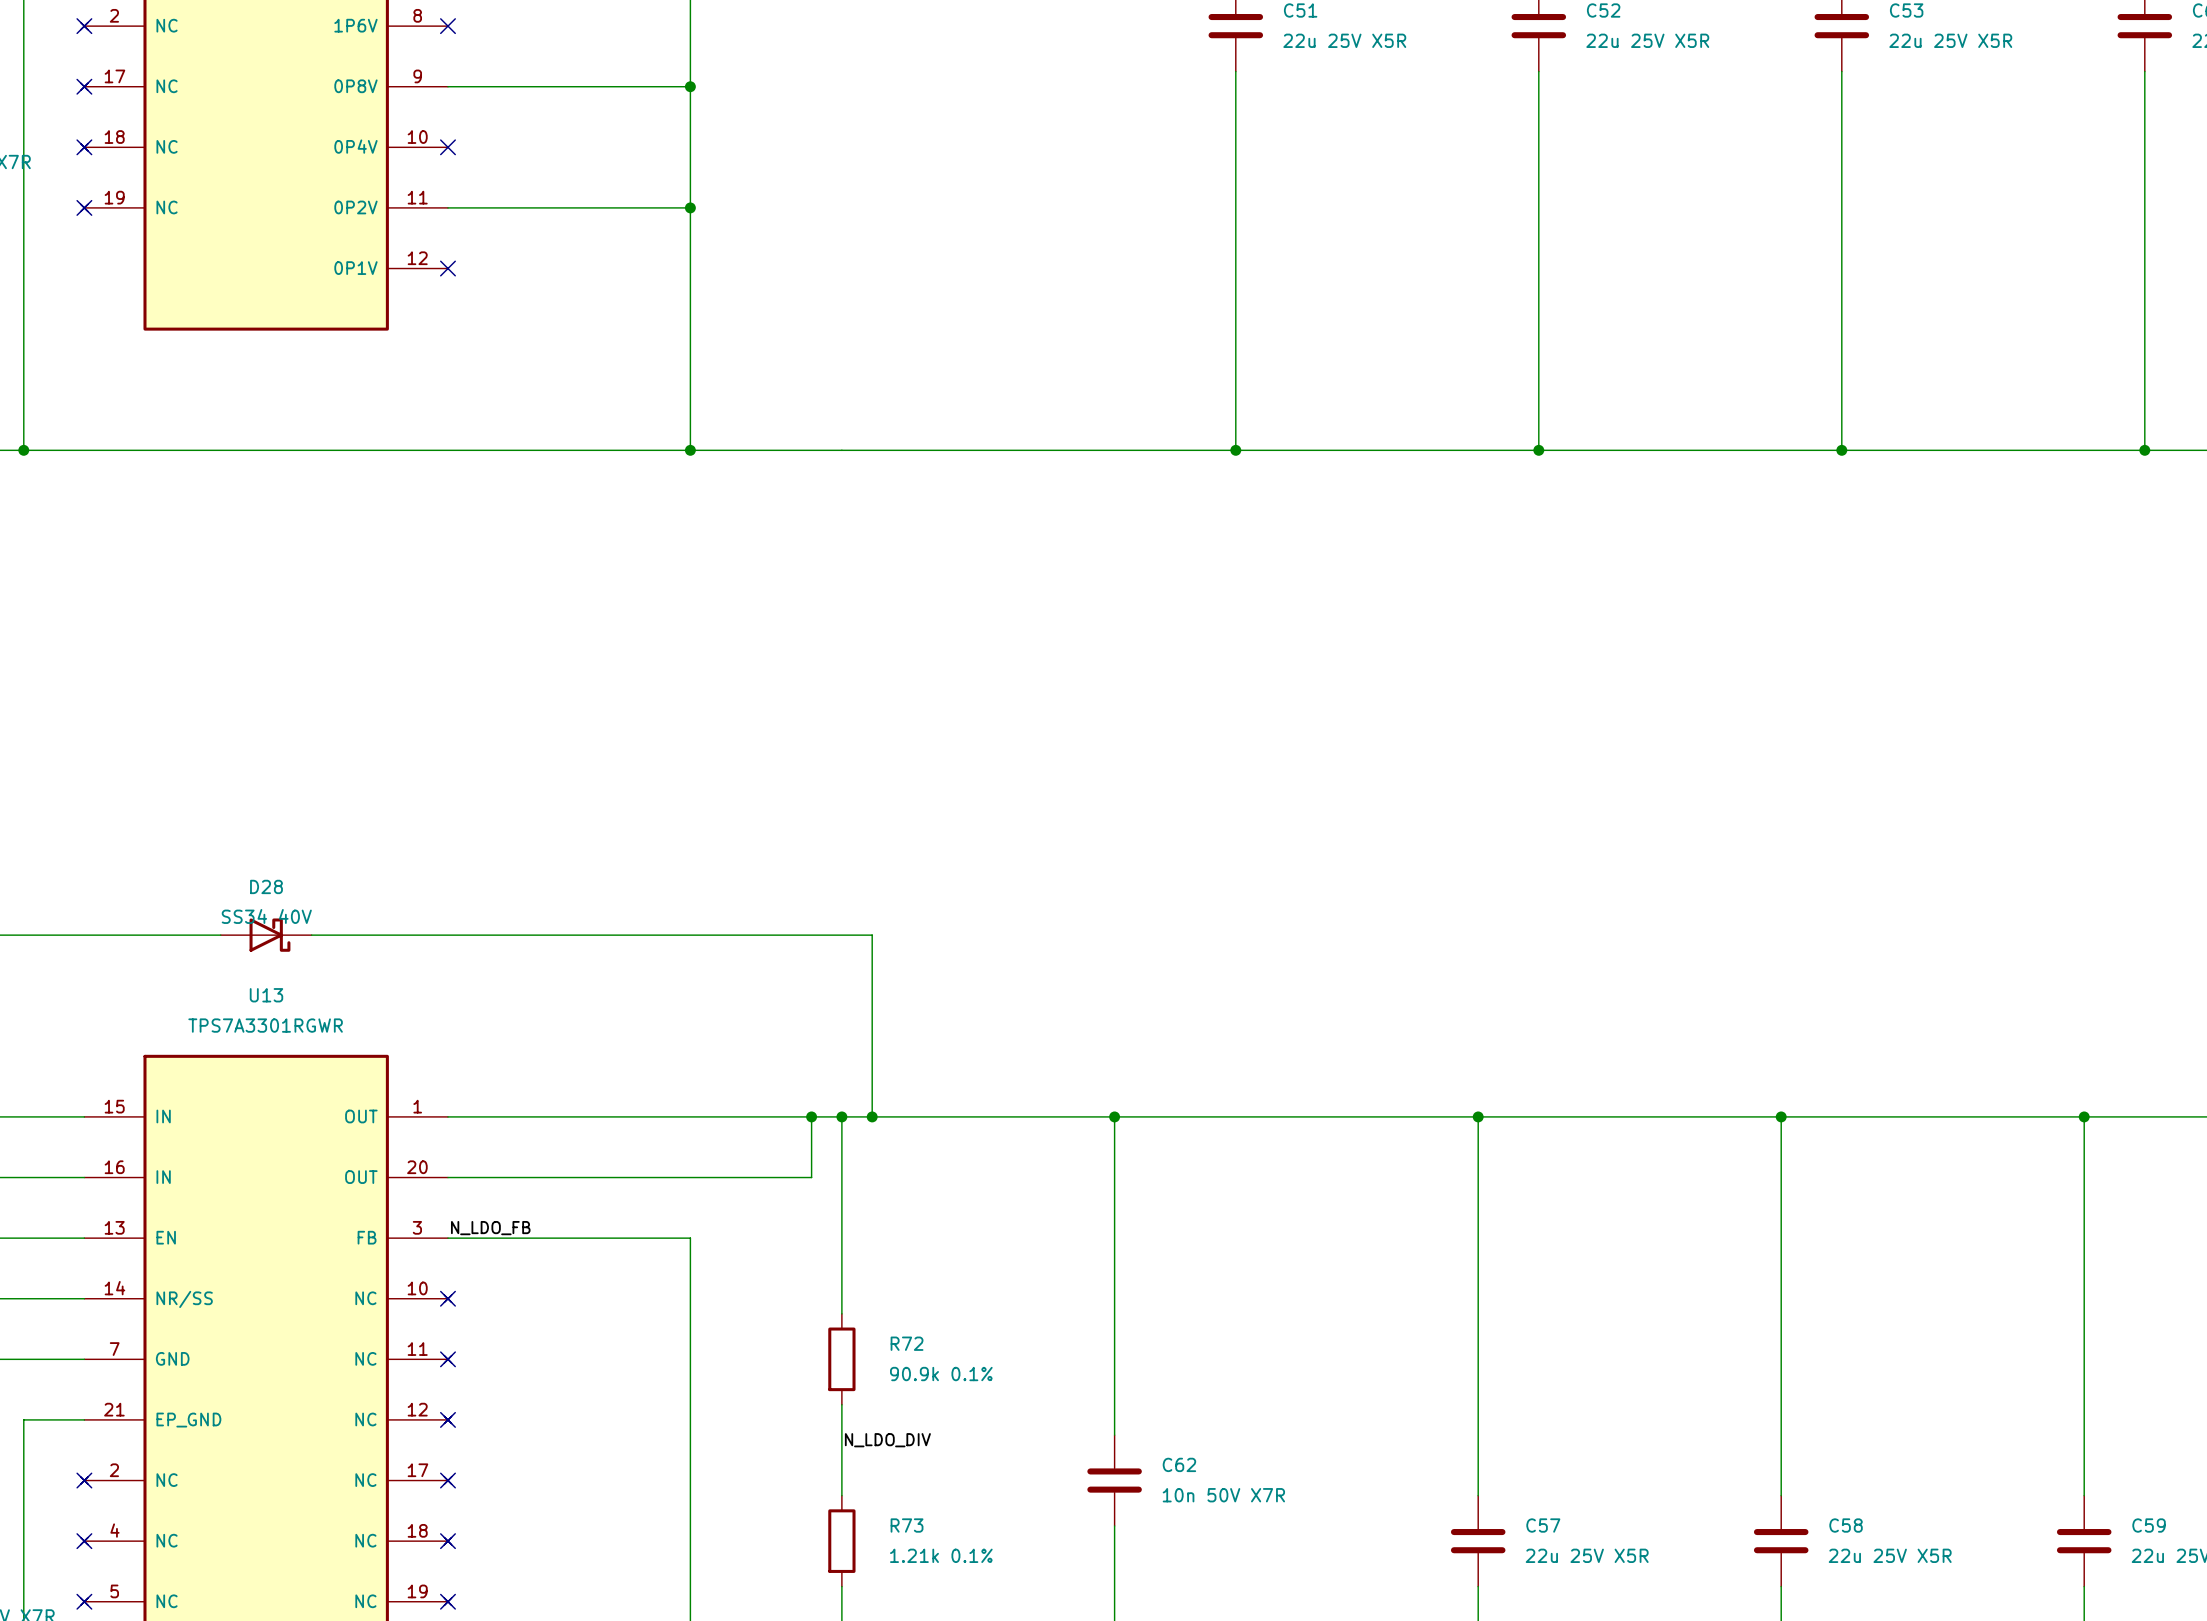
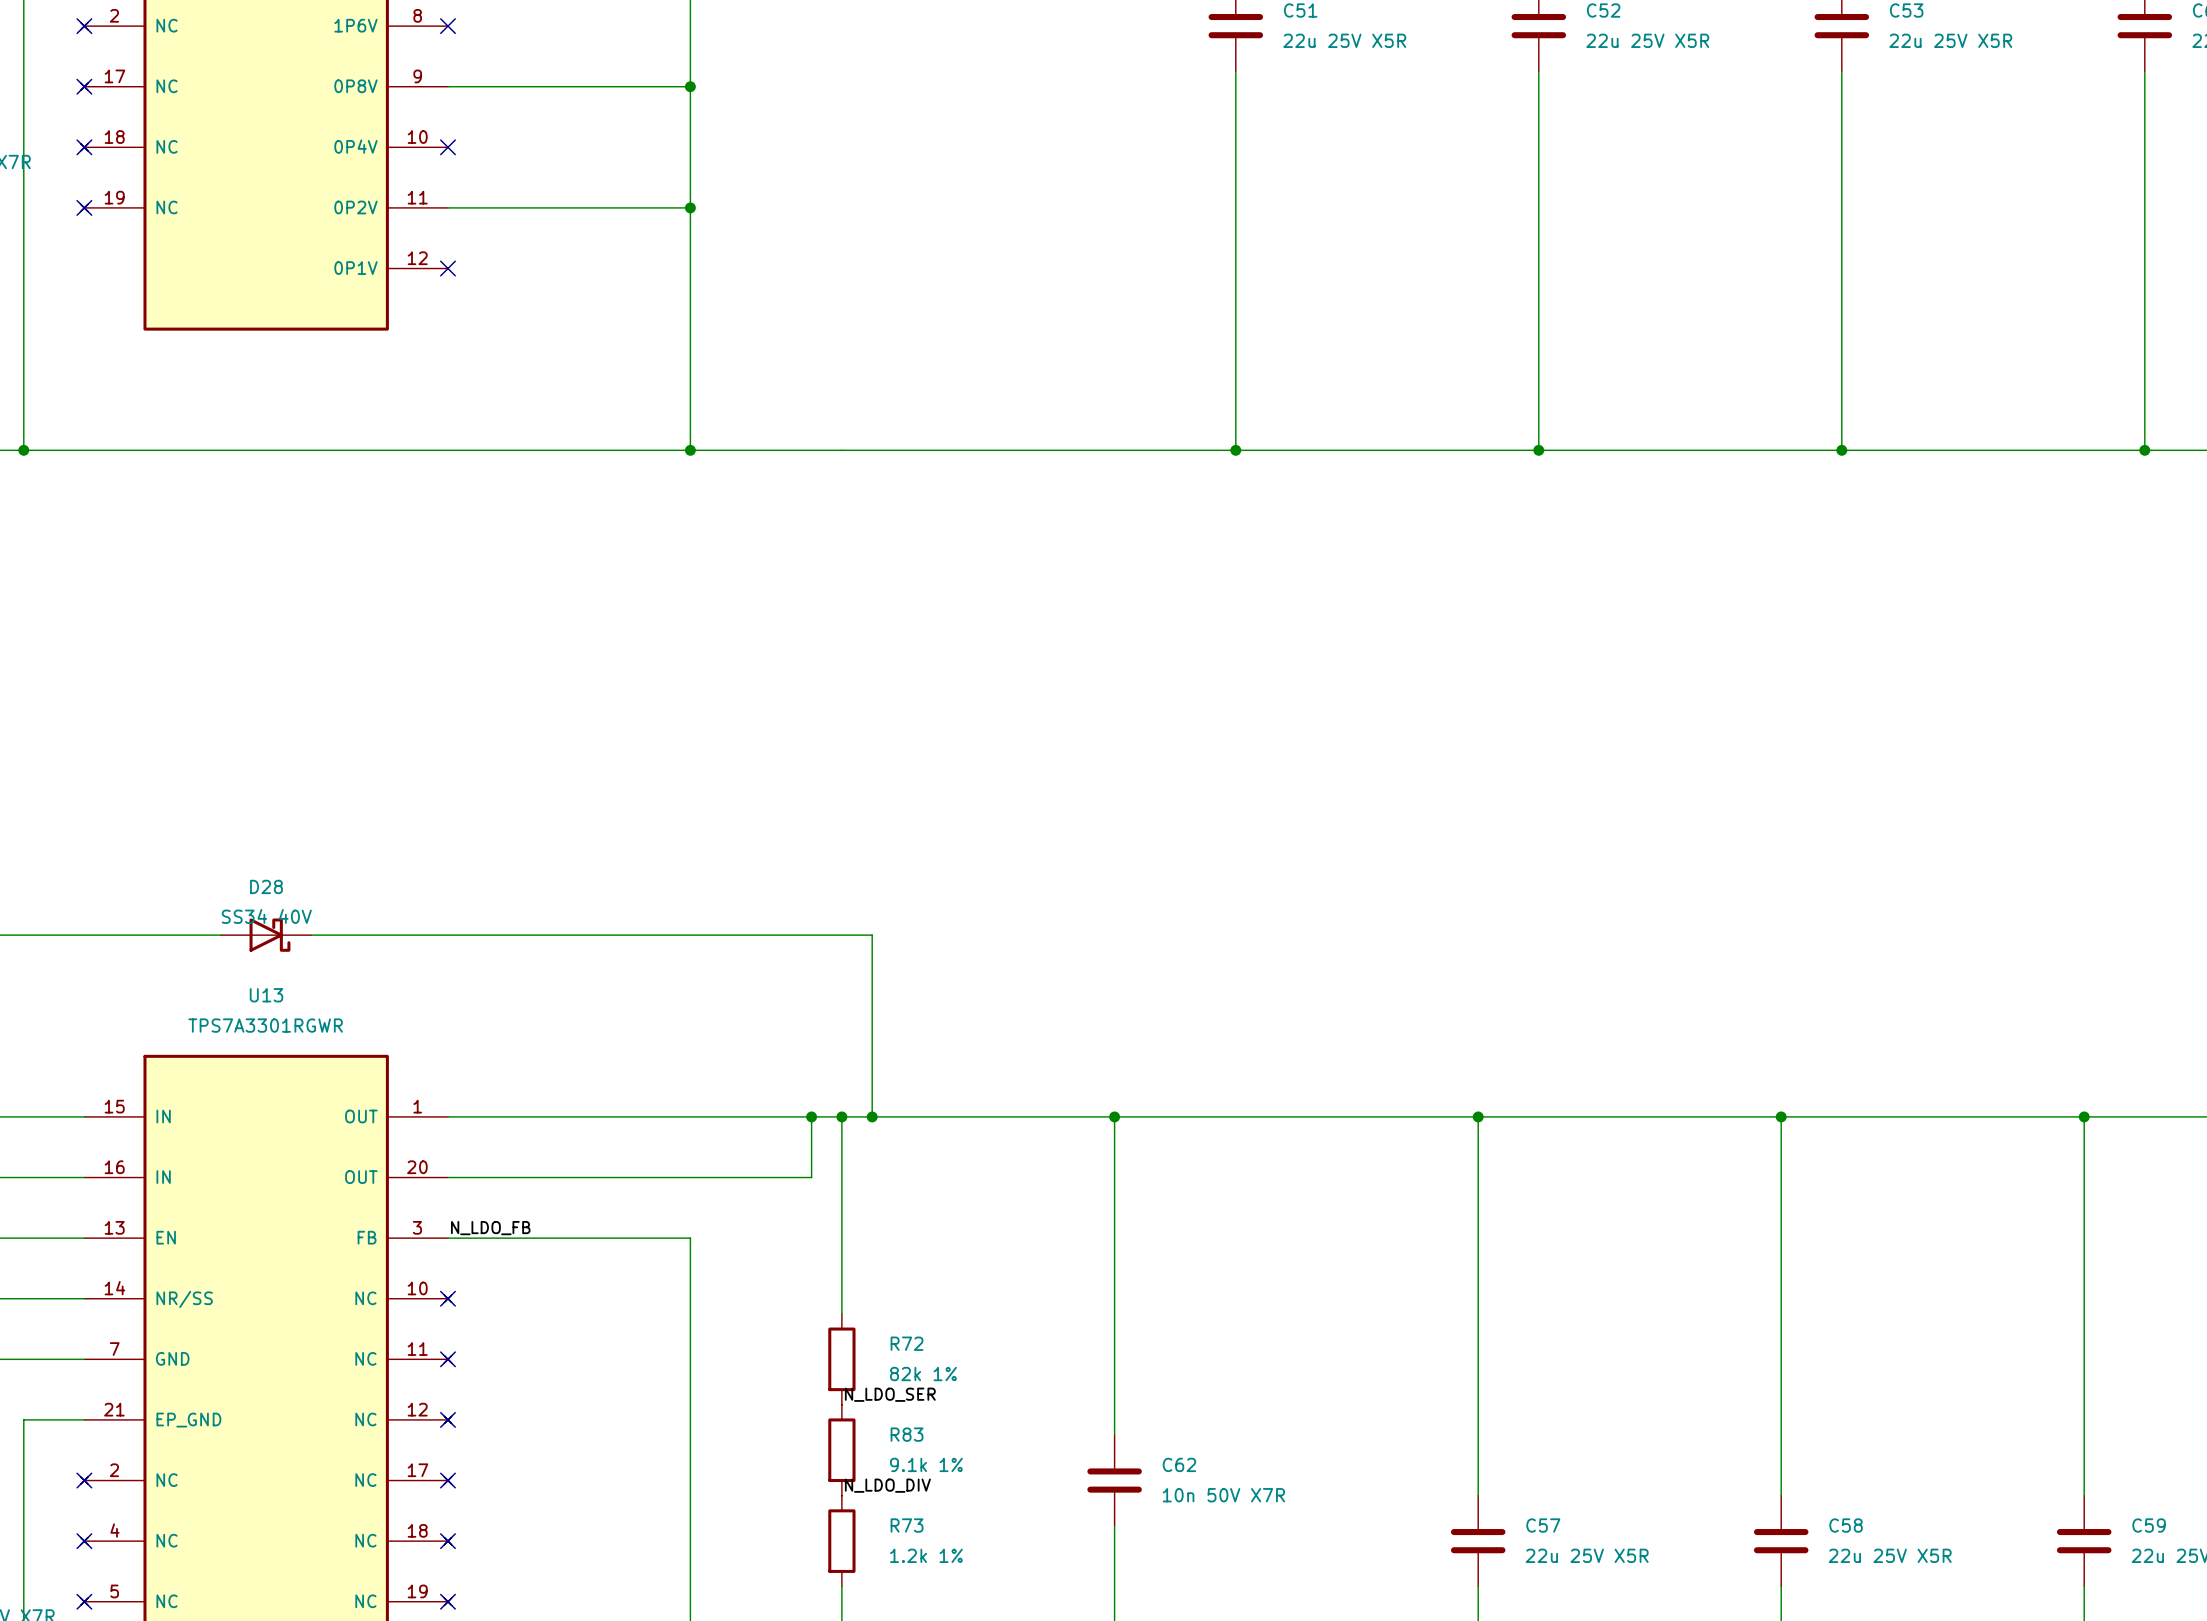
R72 value: 90.9k 0.1% (941, 1374) -> 82k 1% (923, 1374)
label: none -> N_LDO_SER (890, 1394)
wire: (841, 1404) (841, 1495) -> none
label position: N_LDO_DIV (887, 1440) -> N_LDO_DIV (887, 1485)
R83: none -> 9.1k 1% (841, 1450)
R73 value: 1.21k 0.1% (941, 1555) -> 1.2k 1% (926, 1555)

